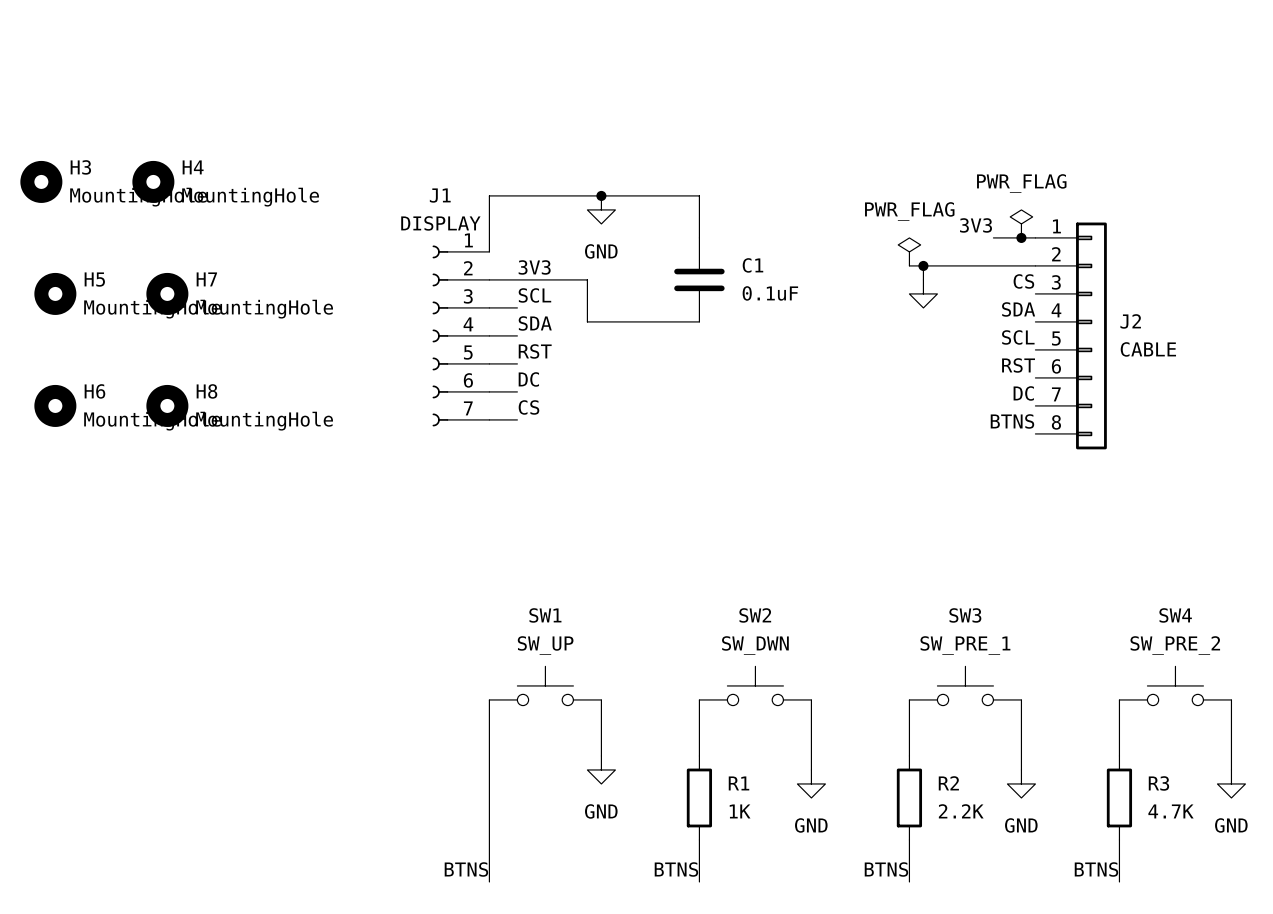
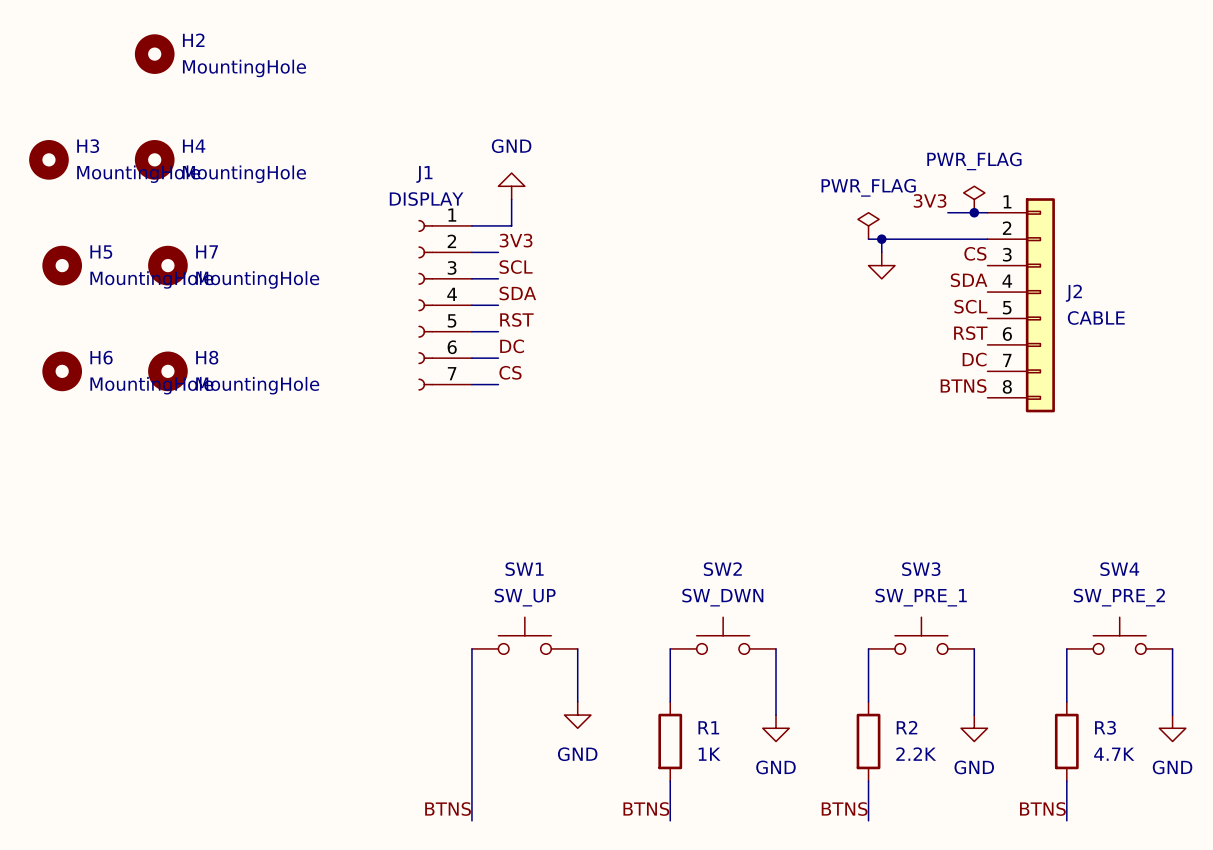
H2: none -> MountingHole (154, 54)
junction: (601, 195) -> none
power symbol rotation: 0° (601, 209) -> 180° (511, 186)
power symbol position: GND (601, 209) -> GND (511, 186)
wire: (699, 237) (699, 195) (489, 195) (489, 251) -> (511, 199) (511, 225) (471, 225)
wire: (517, 279) (587, 279) (587, 321) (699, 321) -> none
C1: 0.1uF (699, 279) -> none

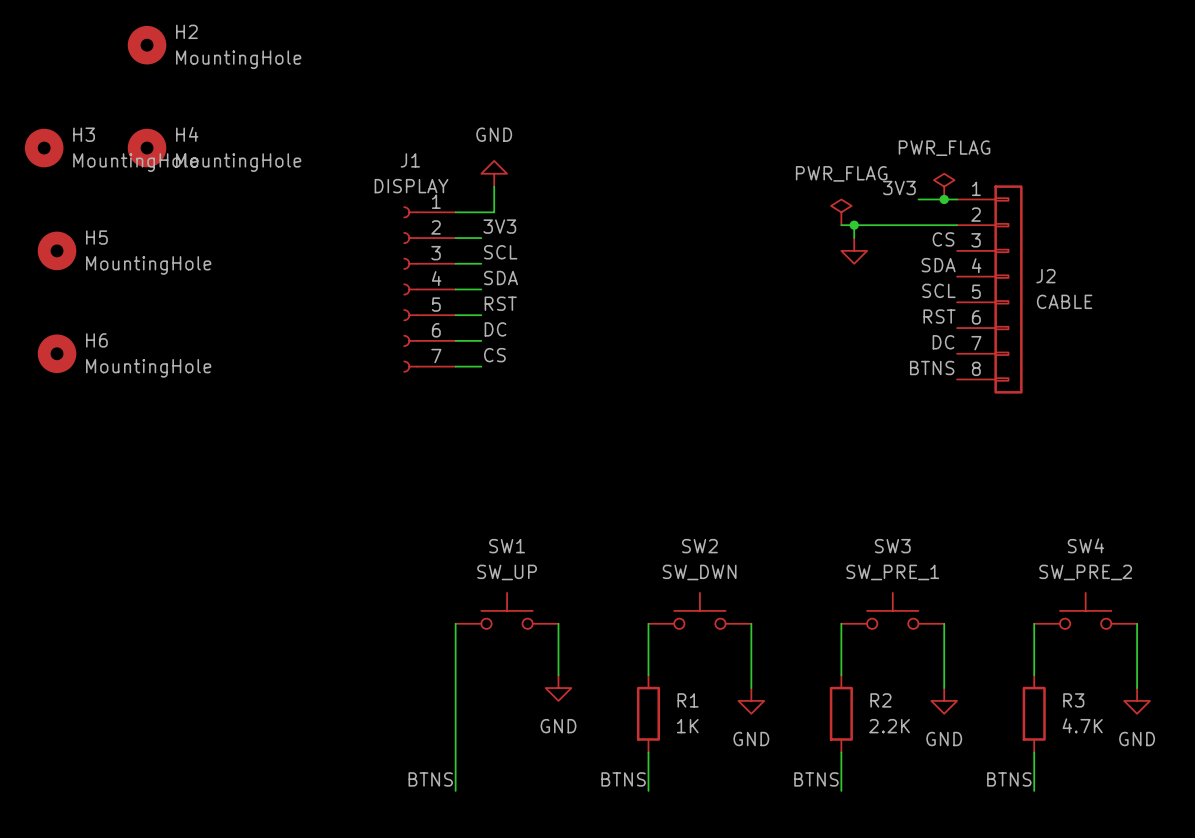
H7: MountingHole (167, 265) -> none
H8: MountingHole (167, 371) -> none

